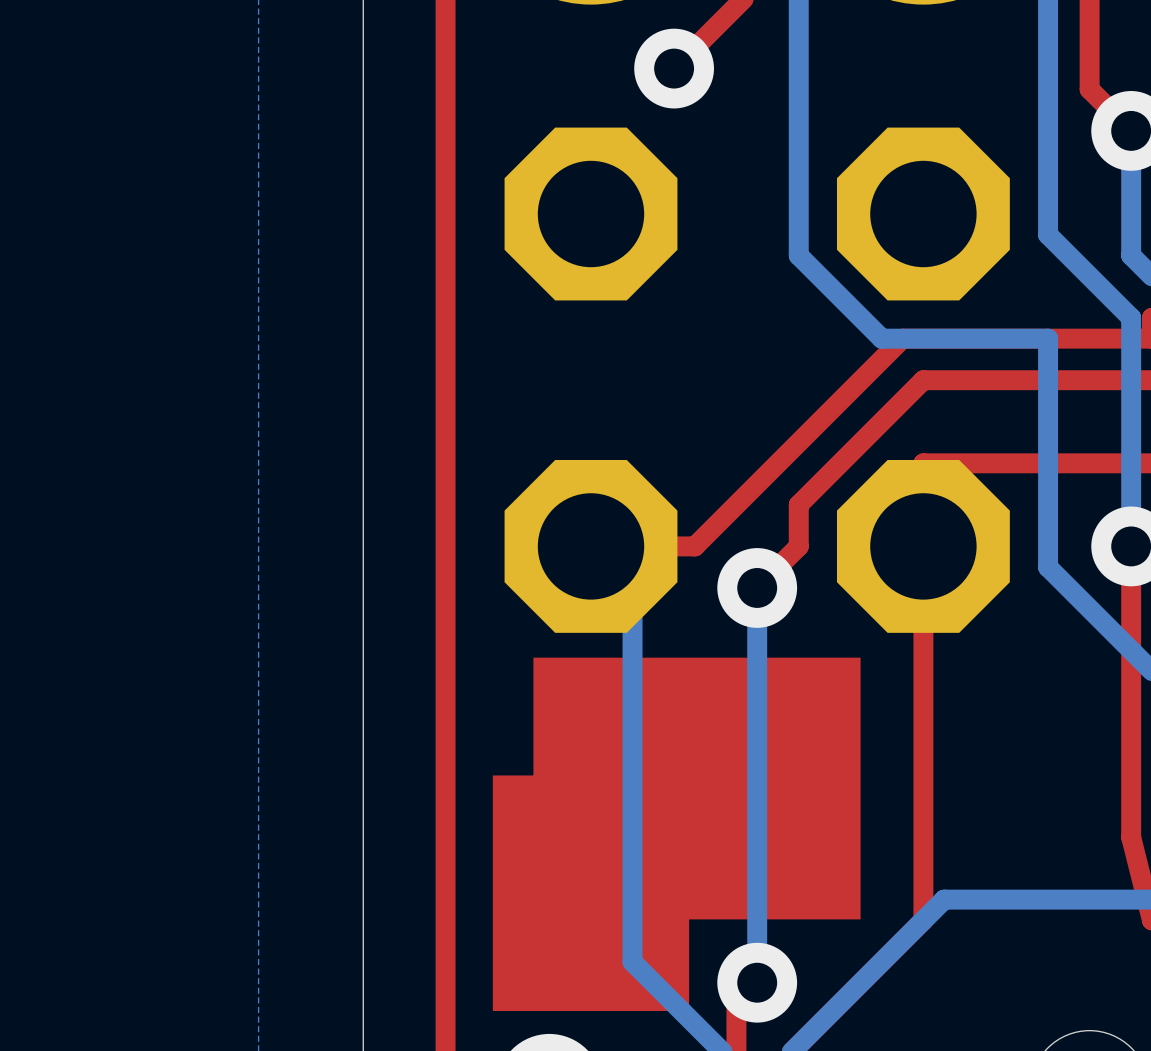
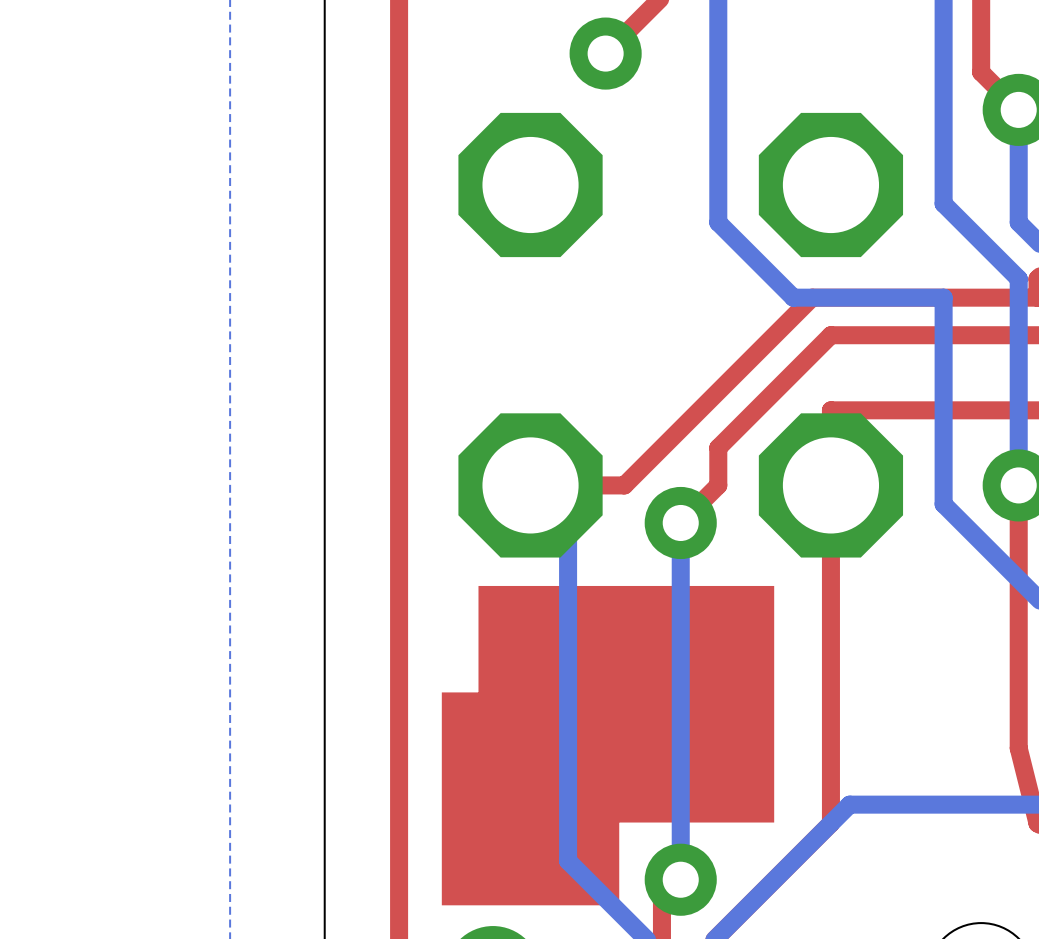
part footprint: [504, 127, 678, 633] -> [458, 112, 603, 558]
part footprint: [836, 127, 1010, 633] -> [758, 112, 904, 558]

